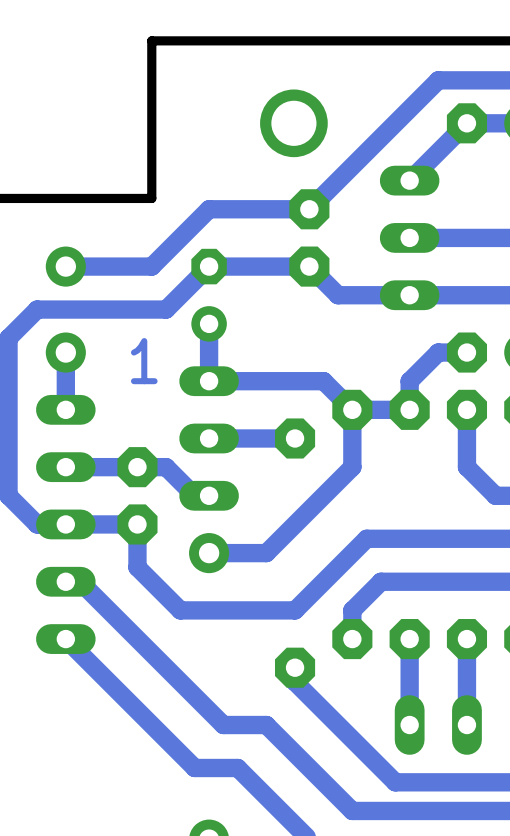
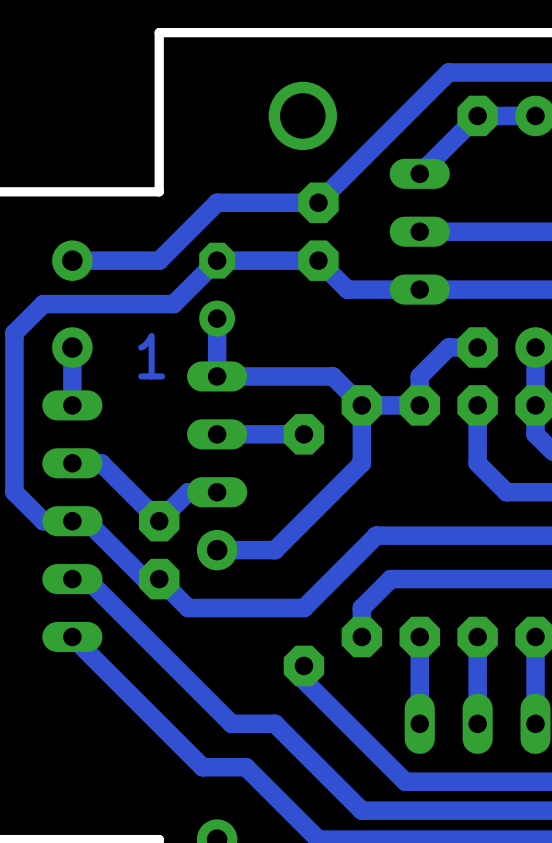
track: (94, 467) (166, 467) (194, 495) -> (101, 463) (159, 521) (188, 492) (202, 492)
part position: (137, 495) -> (159, 550)
track: (80, 524) (137, 524) (137, 567) (151, 581) -> (86, 521) (144, 579) (159, 579)

